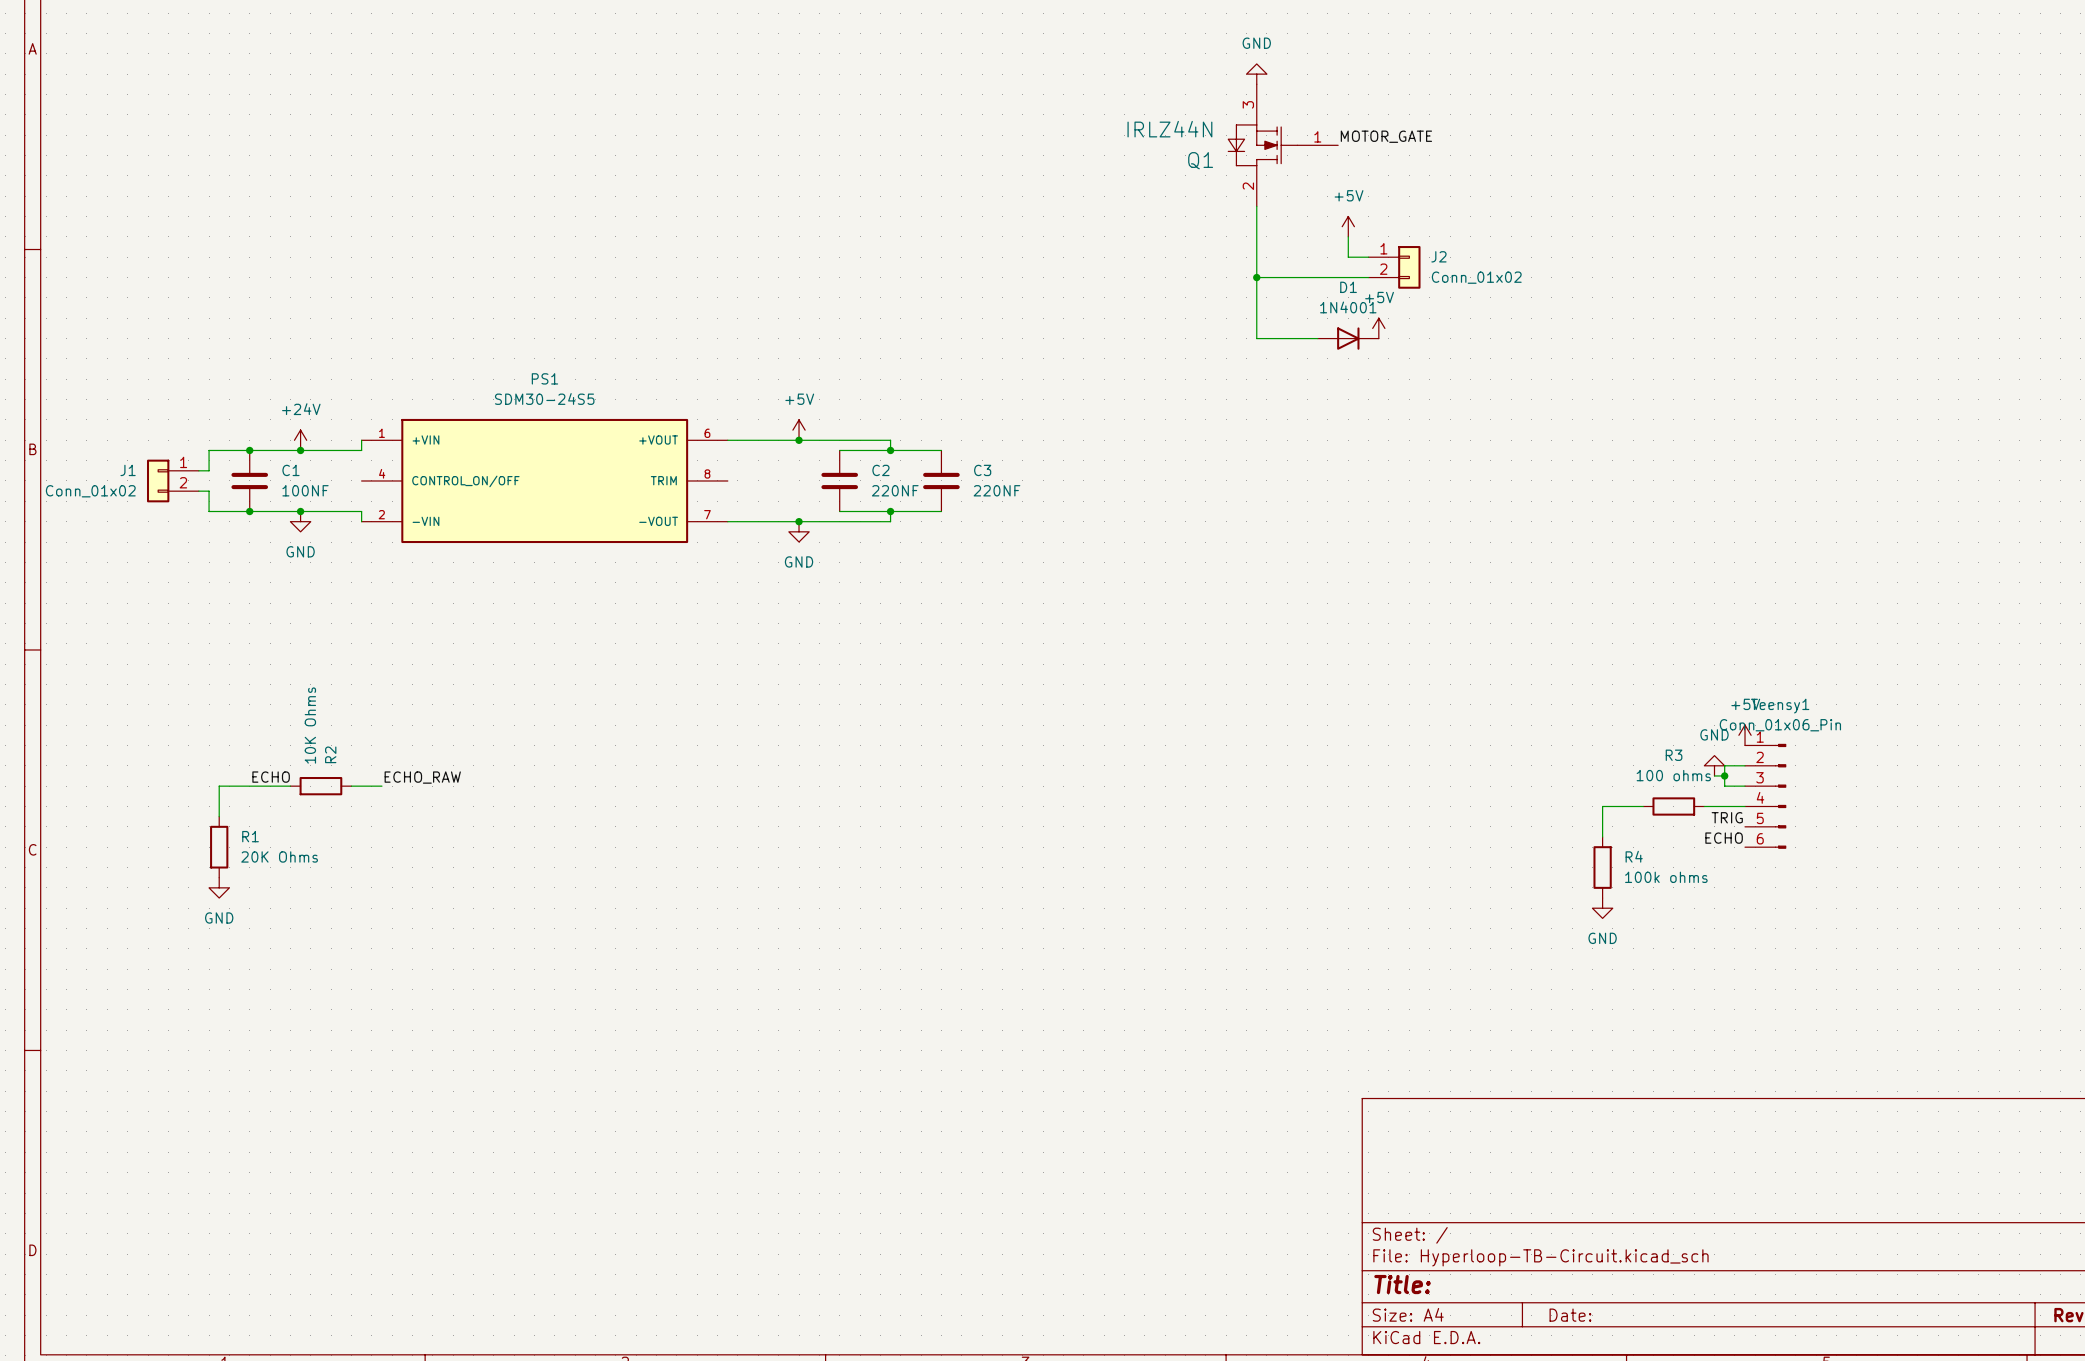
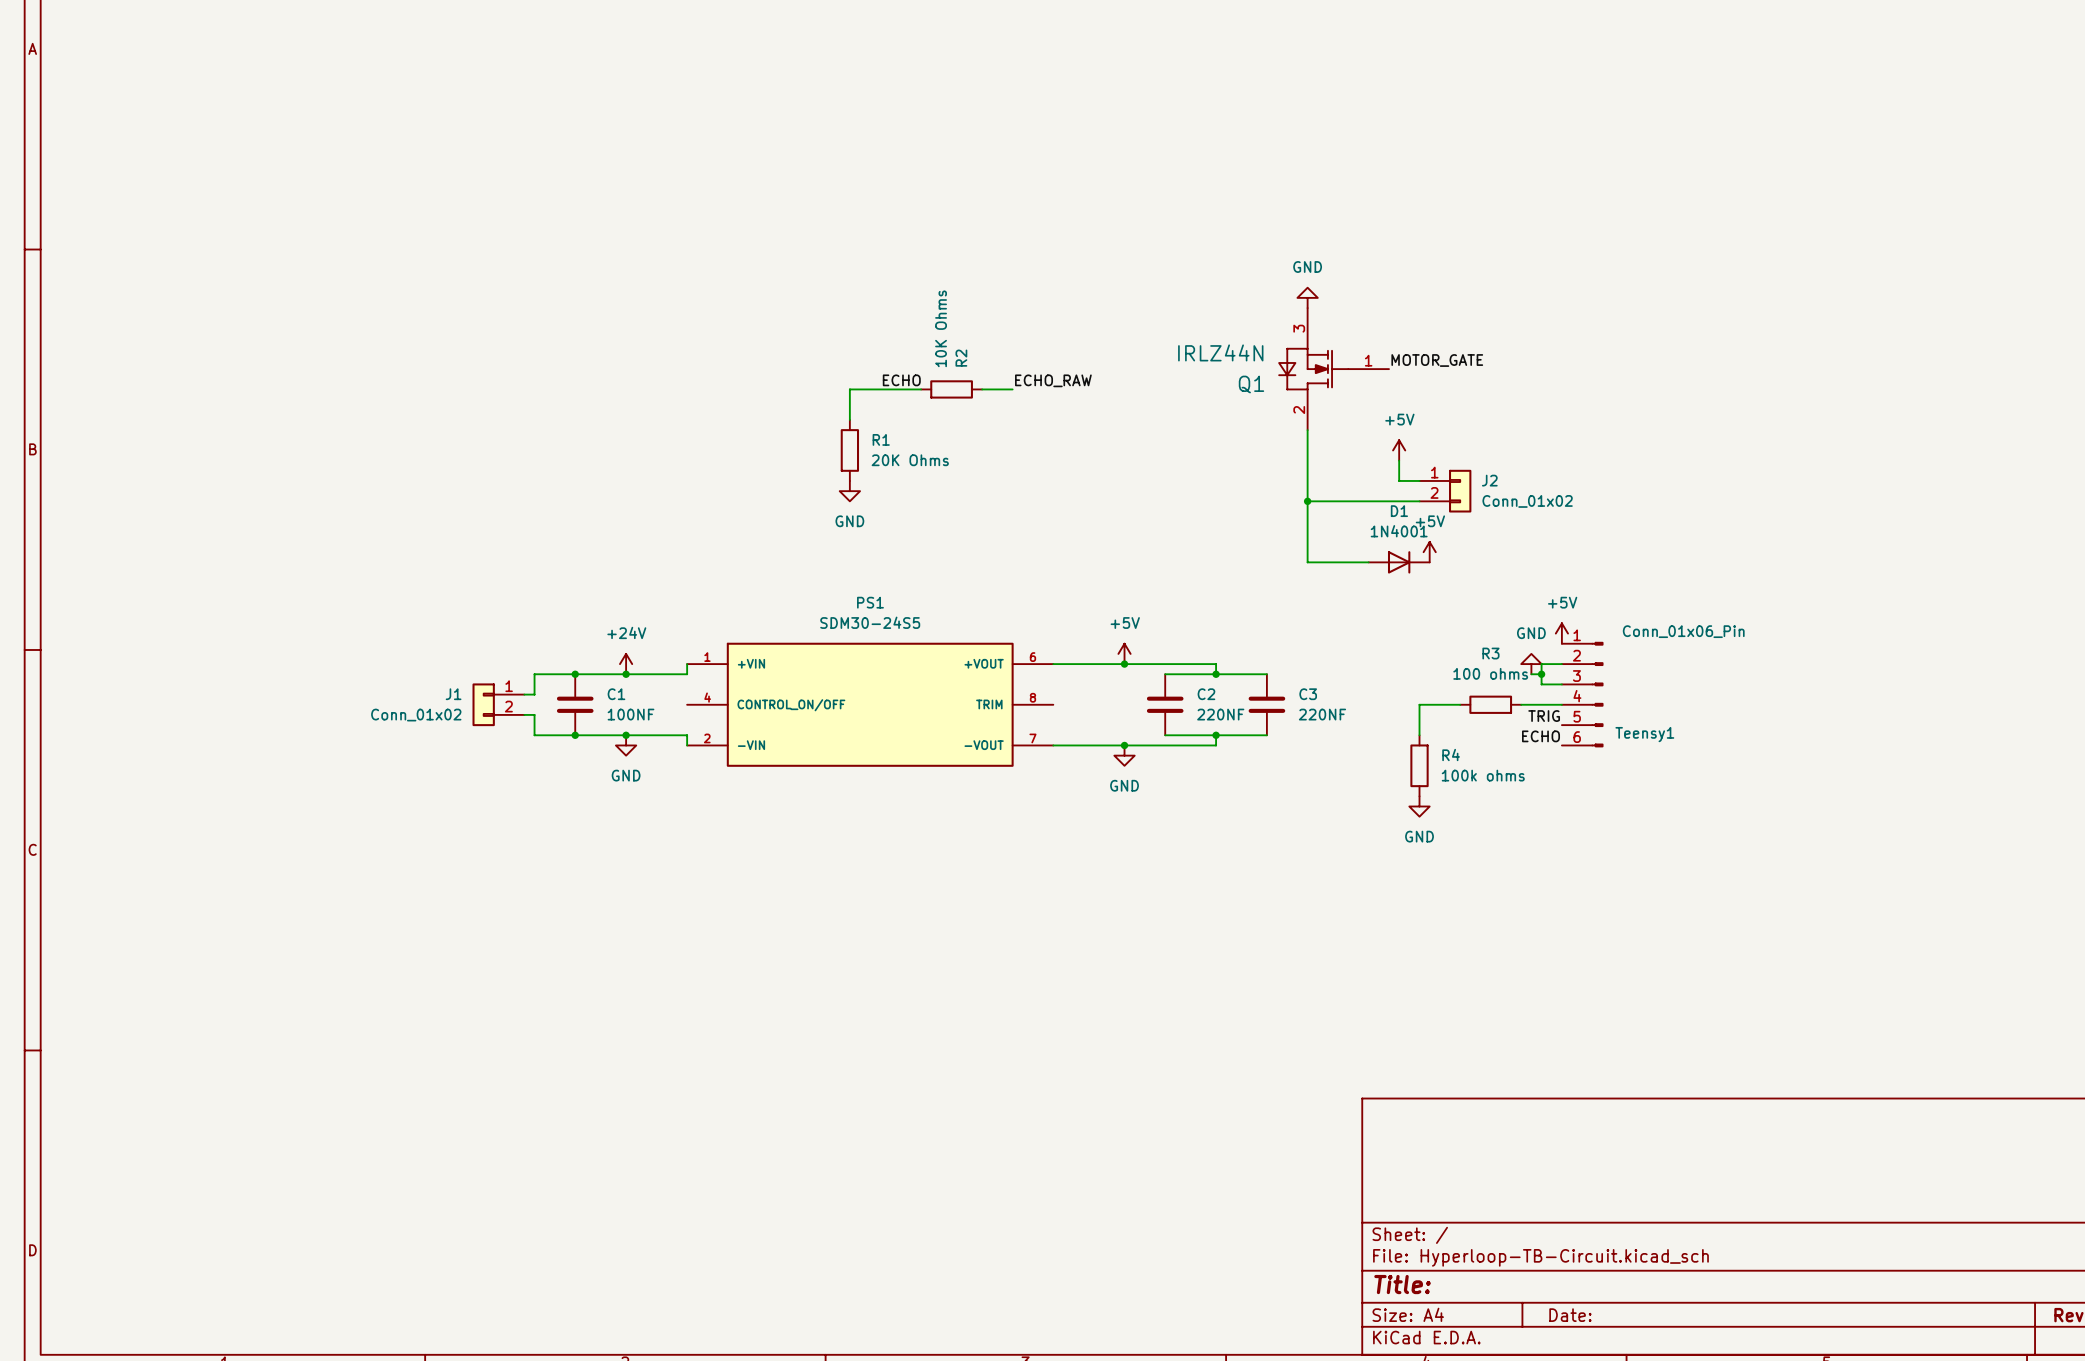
power symbol: GND (1256, 74) -> none
label: MOTOR_GATE (1386, 136) -> none
Q1 position: (1283, 145) -> (1334, 369)
wire: (1256, 206) (1256, 338) (1317, 338) -> none
power symbol: +5V (1348, 226) -> none
wire: (1348, 236) (1348, 257) (1368, 257) -> none
J2 position: (1394, 267) -> (1445, 491)
wire: (1256, 277) (1368, 277) -> none
junction: (1256, 277) -> none
power symbol: none -> GND (1307, 297)
power symbol: +5V (1378, 328) -> none
D1 position: (1348, 338) -> (1399, 562)
label: none -> MOTOR_GATE (1437, 360)
label: none -> ECHO (901, 380)
label: none -> ECHO_RAW (1053, 380)
wire: none -> (921, 389) (849, 389) (849, 419)
wire: none -> (982, 389) (1012, 389)
power symbol: +5V (799, 430) -> none
wire: none -> (1307, 430) (1307, 562) (1368, 562)
power symbol: +24V (300, 440) -> none
wire: (361, 440) (361, 450) (209, 450) (209, 470) (198, 470) -> none
wire: (727, 440) (890, 440) (890, 450) -> none
junction: (799, 440) -> none
junction: (249, 450) -> none
junction: (300, 450) -> none
wire: (839, 450) (941, 450) -> none
junction: (890, 450) -> none
power symbol: none -> +5V (1399, 450)
wire: none -> (1399, 460) (1399, 480) (1419, 480)
J1 position: (172, 480) -> (498, 704)
C1 position: (249, 480) -> (575, 704)
PS1 position: (544, 480) -> (870, 704)
C2 position: (839, 480) -> (1165, 704)
C3 position: (941, 480) -> (1266, 704)
wire: (198, 491) (209, 491) (209, 511) (361, 511) (361, 521) -> none
wire: none -> (1307, 501) (1419, 501)
junction: none -> (1307, 501)
junction: (249, 511) -> none
junction: (300, 511) -> none
wire: (839, 511) (941, 511) -> none
wire: (890, 511) (890, 521) (727, 521) -> none
junction: (890, 511) -> none
power symbol: GND (300, 521) -> none
junction: (799, 521) -> none
power symbol position: GND (799, 531) -> GND (849, 491)
power symbol: none -> +5V (1429, 552)
power symbol: none -> +5V (1561, 633)
power symbol: none -> +5V (1124, 653)
power symbol: none -> +24V (626, 664)
wire: none -> (687, 664) (687, 674) (534, 674) (534, 694) (524, 694)
wire: none -> (1053, 664) (1216, 664) (1216, 674)
junction: none -> (1124, 664)
power symbol: none -> GND (1531, 664)
wire: none -> (1561, 664) (1541, 664) (1541, 684) (1561, 684)
junction: none -> (575, 674)
junction: none -> (626, 674)
wire: none -> (1165, 674) (1266, 674)
junction: none -> (1216, 674)
wire: none -> (1531, 674) (1541, 674)
junction: none -> (1541, 674)
wire: none -> (1460, 704) (1419, 704) (1419, 735)
wire: none -> (1521, 704) (1561, 704)
Teensy1 name position: Teensy1 (1780, 706) -> Teensy1 (1644, 734)
wire: none -> (524, 714) (534, 714) (534, 735) (687, 735) (687, 745)
label: none -> TRIG (1544, 716)
Teensy1 value position: Conn_01x06_Pin (1780, 725) -> Conn_01x06_Pin (1683, 631)
junction: none -> (575, 735)
junction: none -> (626, 735)
wire: none -> (1165, 735) (1266, 735)
wire: none -> (1216, 735) (1216, 745) (1053, 745)
junction: none -> (1216, 735)
power symbol: +5V (1745, 735) -> none
label: none -> ECHO (1541, 736)
power symbol: none -> GND (626, 745)
junction: none -> (1124, 745)
power symbol: none -> GND (1124, 755)
power symbol: GND (1714, 765) -> none
wire: (1745, 765) (1724, 765) (1724, 786) (1745, 786) -> none
wire: (1714, 775) (1724, 775) -> none
junction: (1724, 775) -> none
label: ECHO (271, 777) -> none
label: ECHO_RAW (422, 777) -> none
wire: (290, 786) (219, 786) (219, 816) -> none
R2 position: (320, 786) -> (951, 389)
wire: (351, 786) (381, 786) -> none
Teensy1 position: (1765, 796) -> (1582, 694)
power symbol: none -> GND (1419, 806)
wire: (1643, 806) (1602, 806) (1602, 837) -> none
R3 position: (1673, 806) -> (1490, 704)
wire: (1704, 806) (1745, 806) -> none
label: TRIG (1727, 817) -> none
label: ECHO (1724, 838) -> none
R1 position: (219, 847) -> (849, 450)
R4 position: (1602, 867) -> (1419, 765)
power symbol: GND (219, 887) -> none
power symbol: GND (1602, 908) -> none

